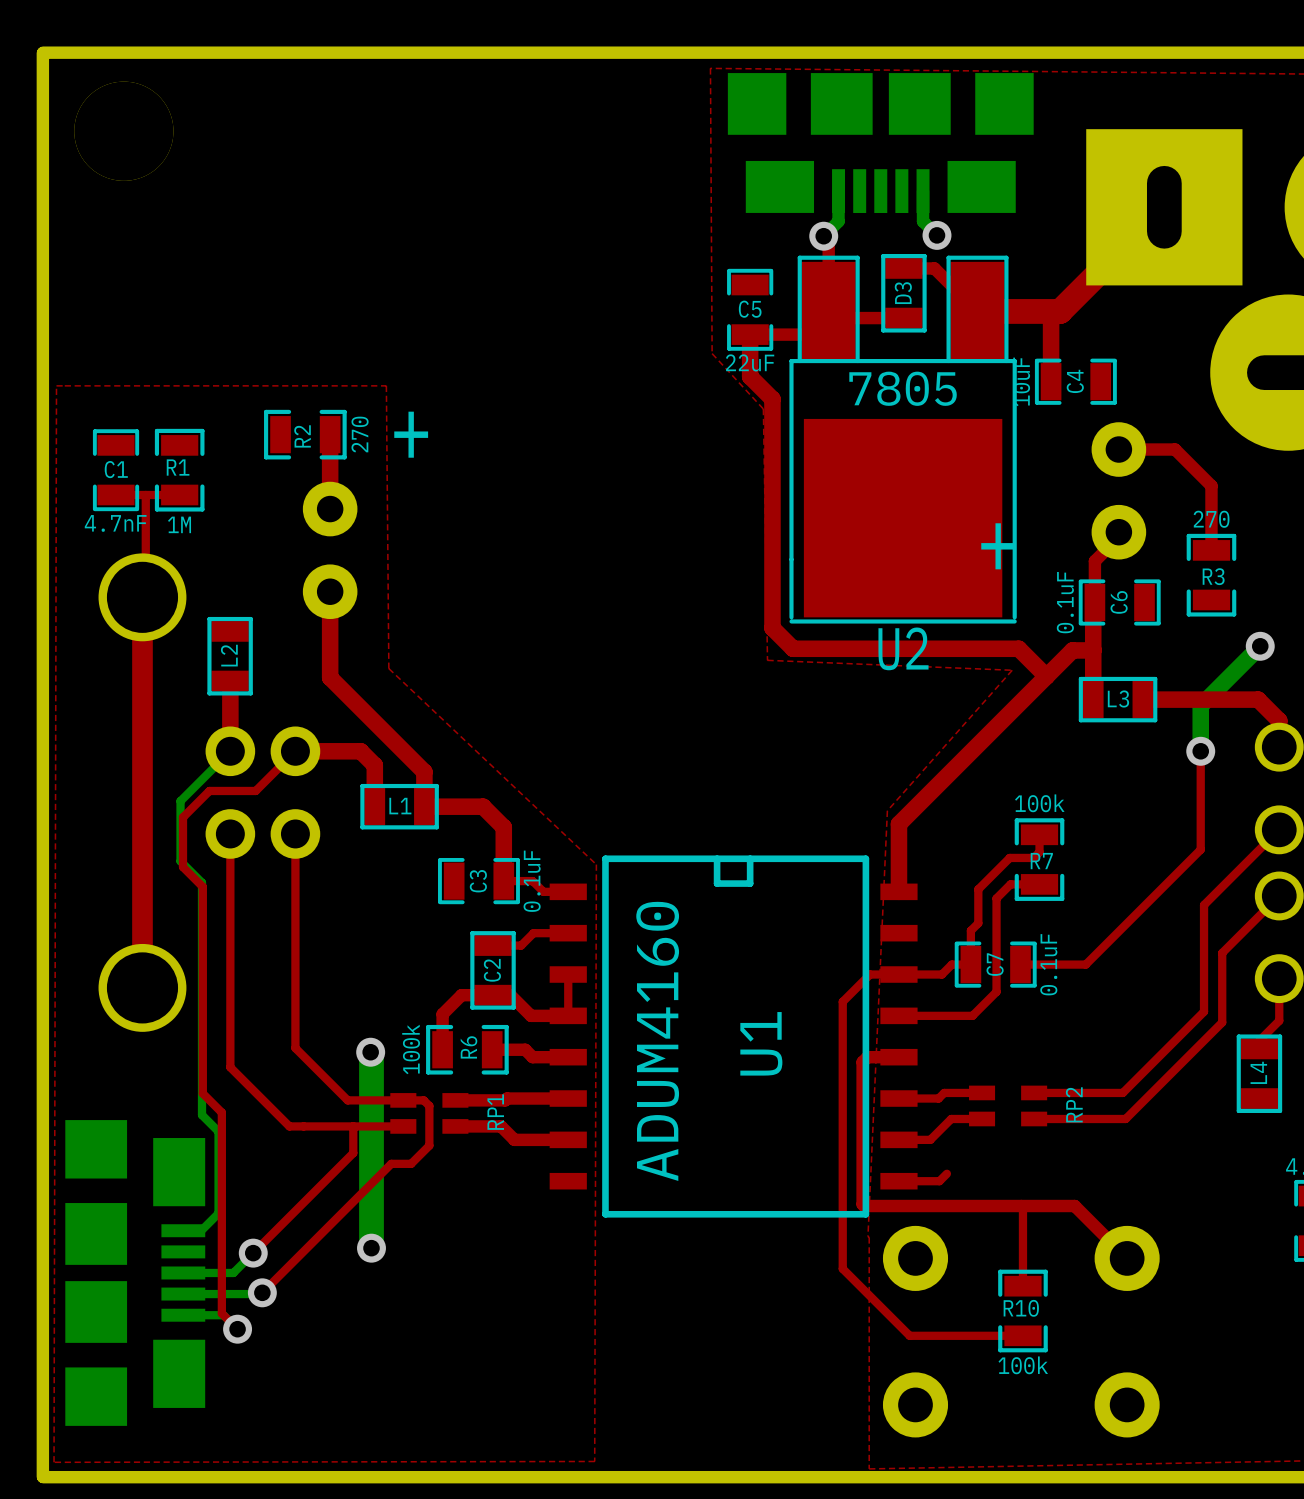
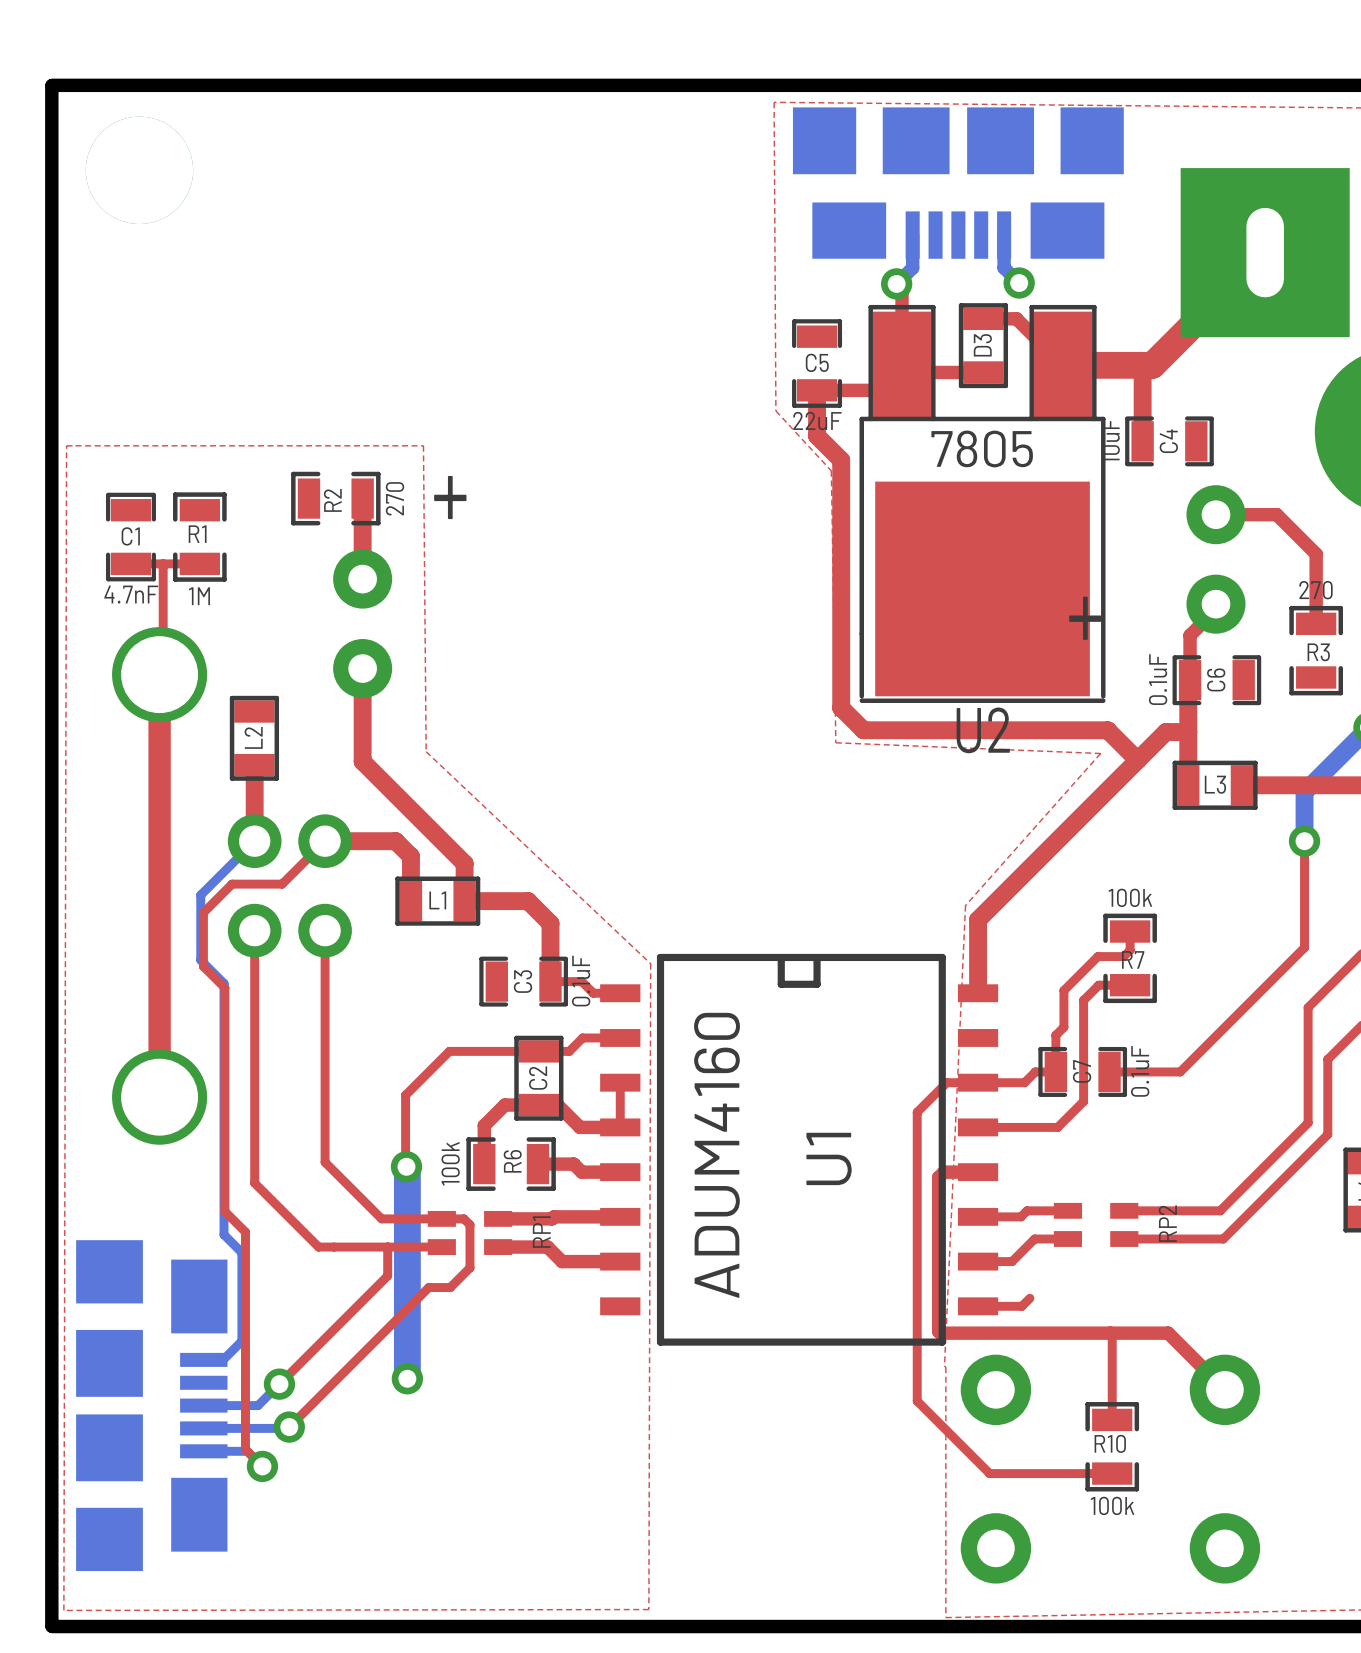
top track: none -> (538, 1051) (449, 1051) (405, 1095) (405, 1170)

